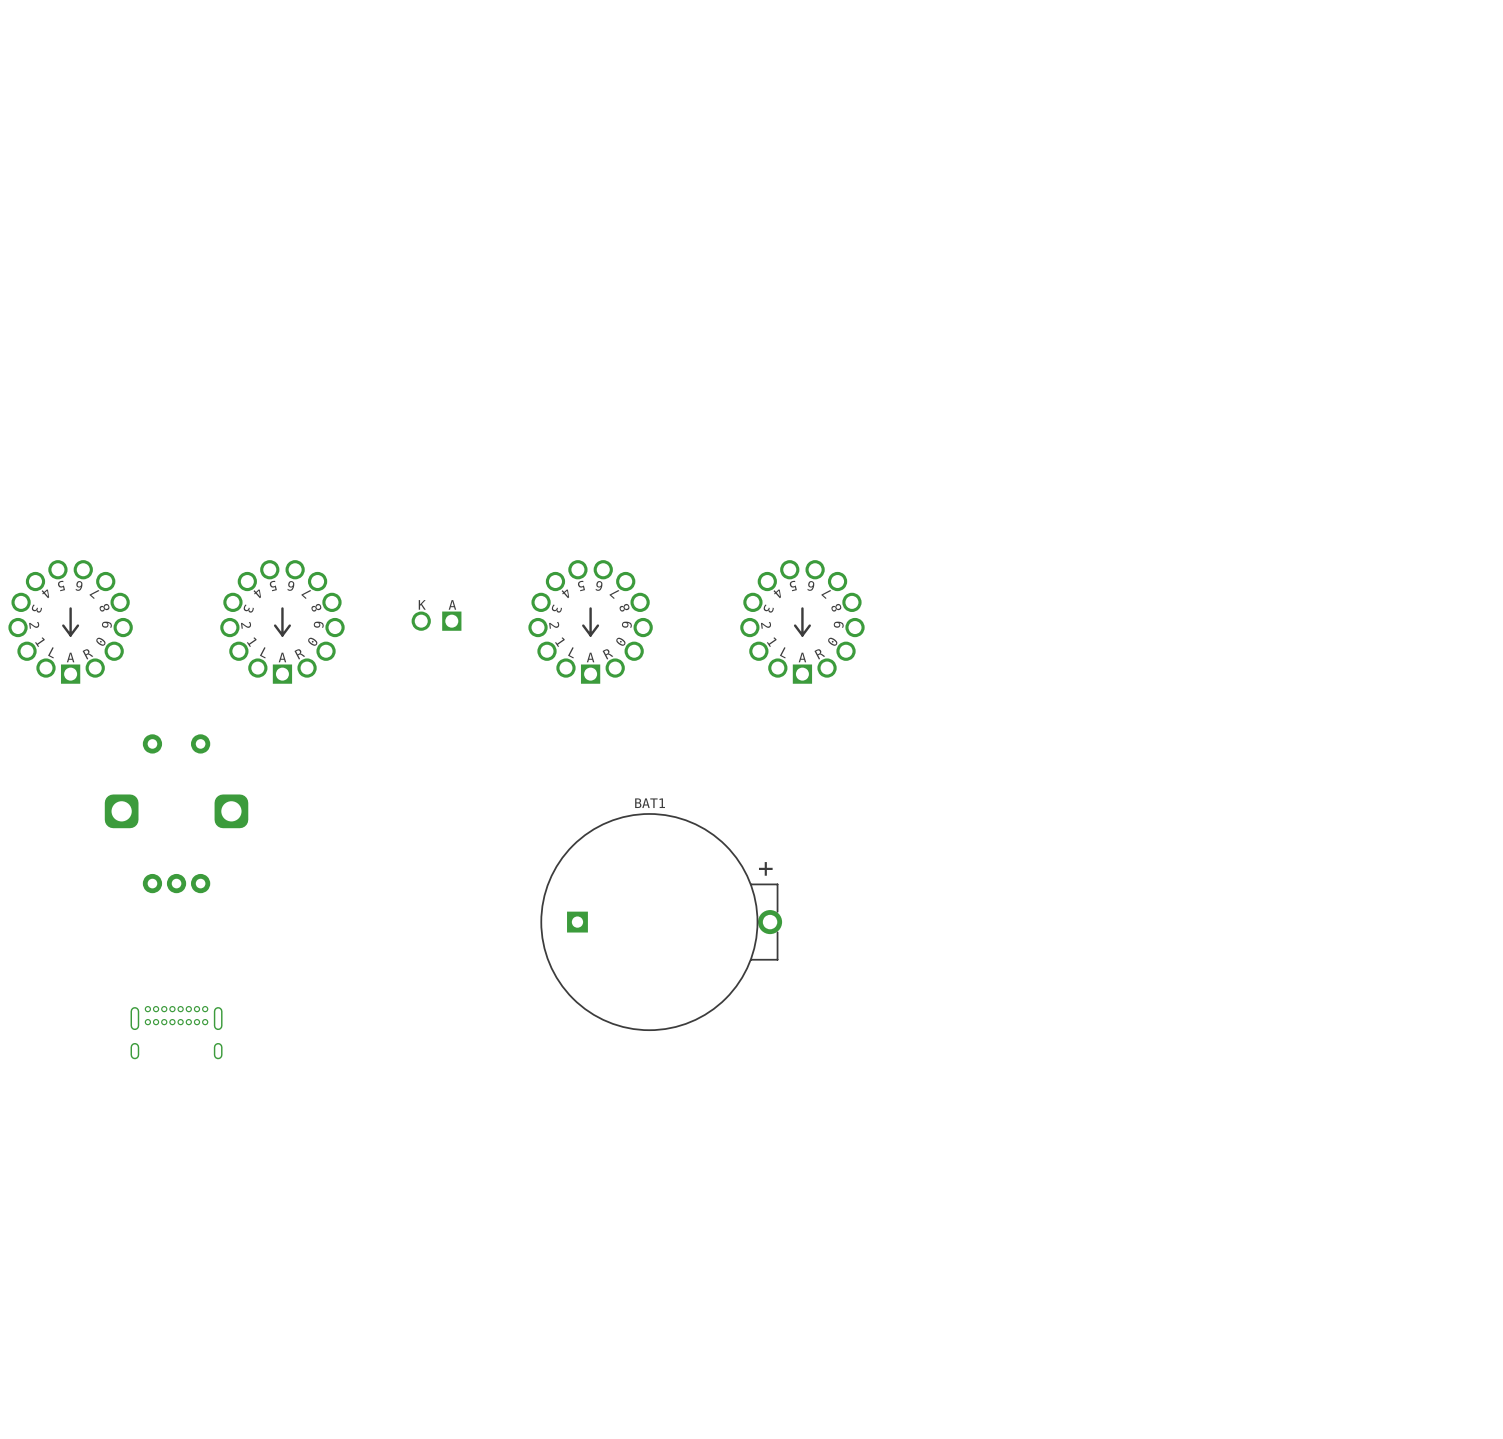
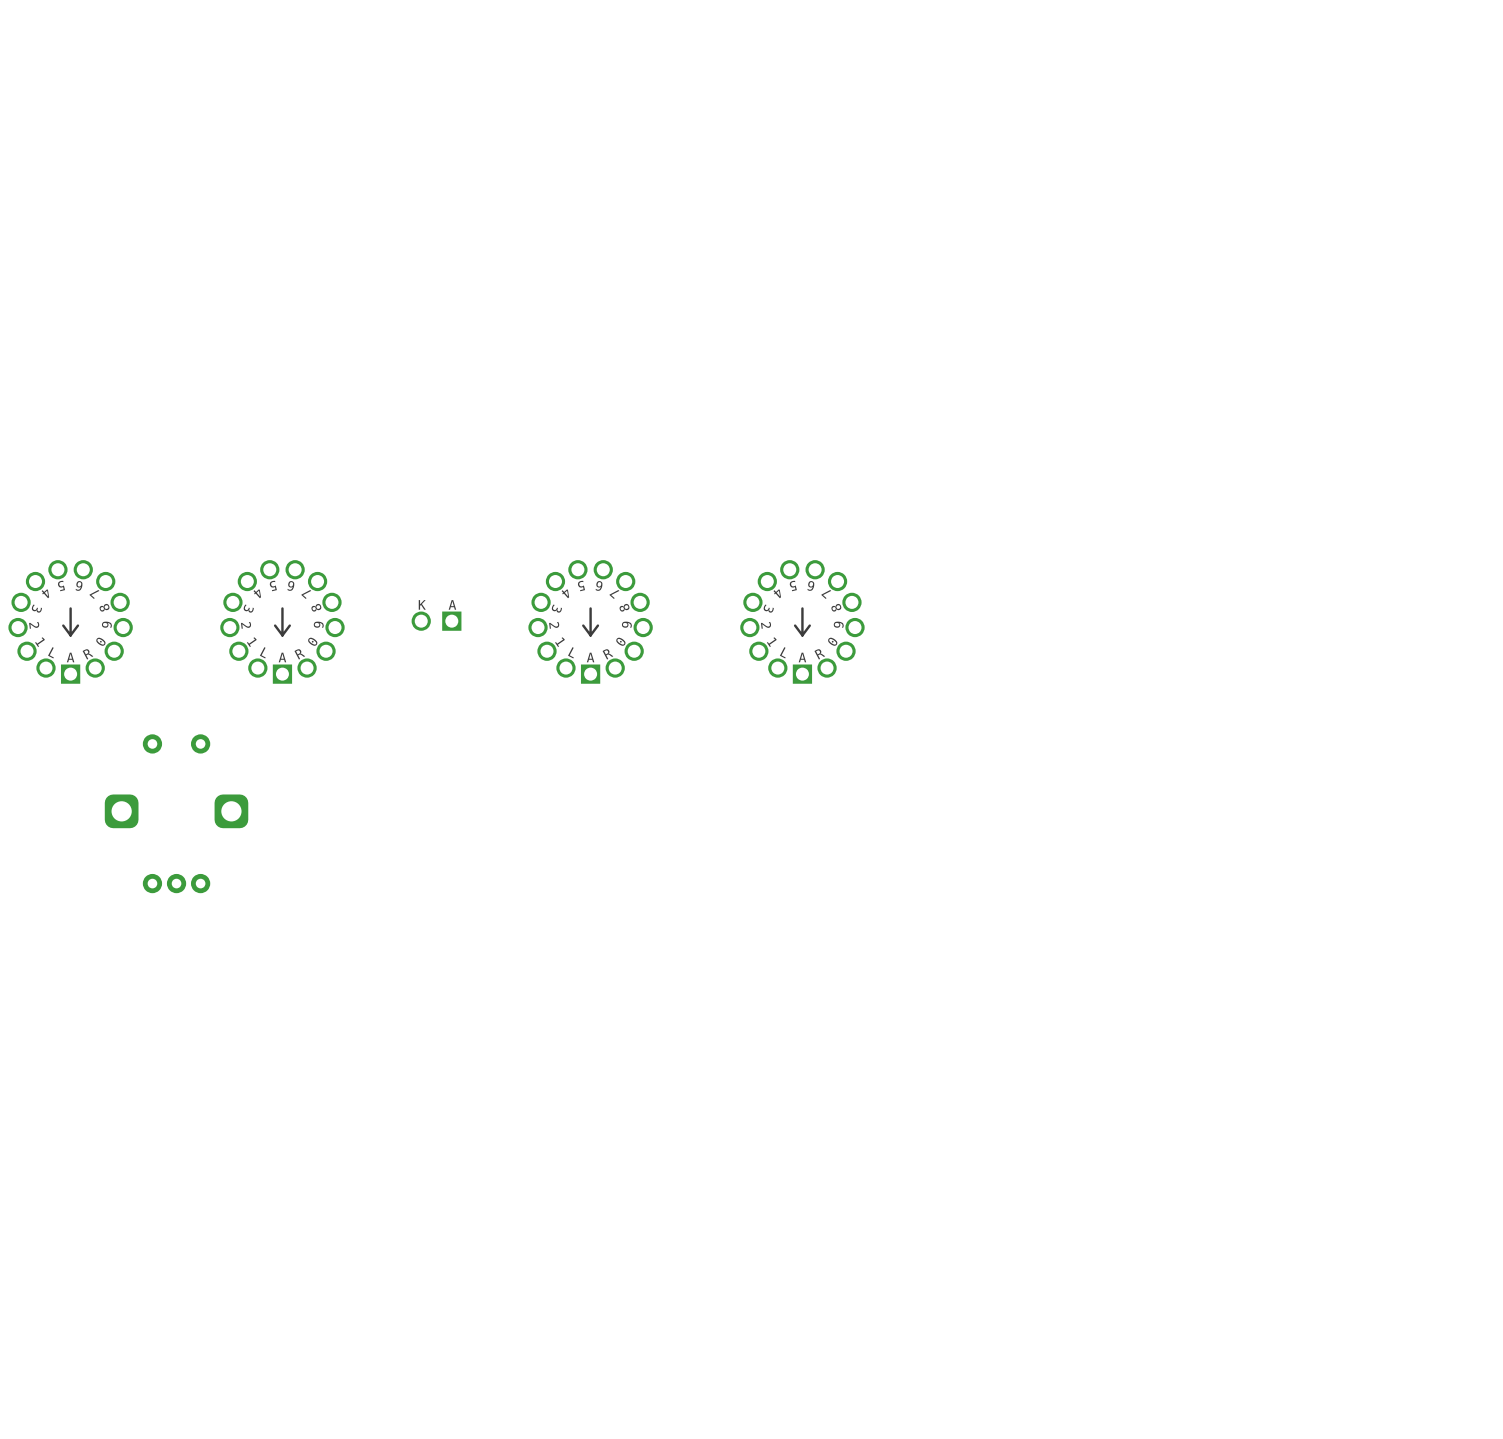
BAT1: (661, 922) -> none
part: (176, 1032) -> none

